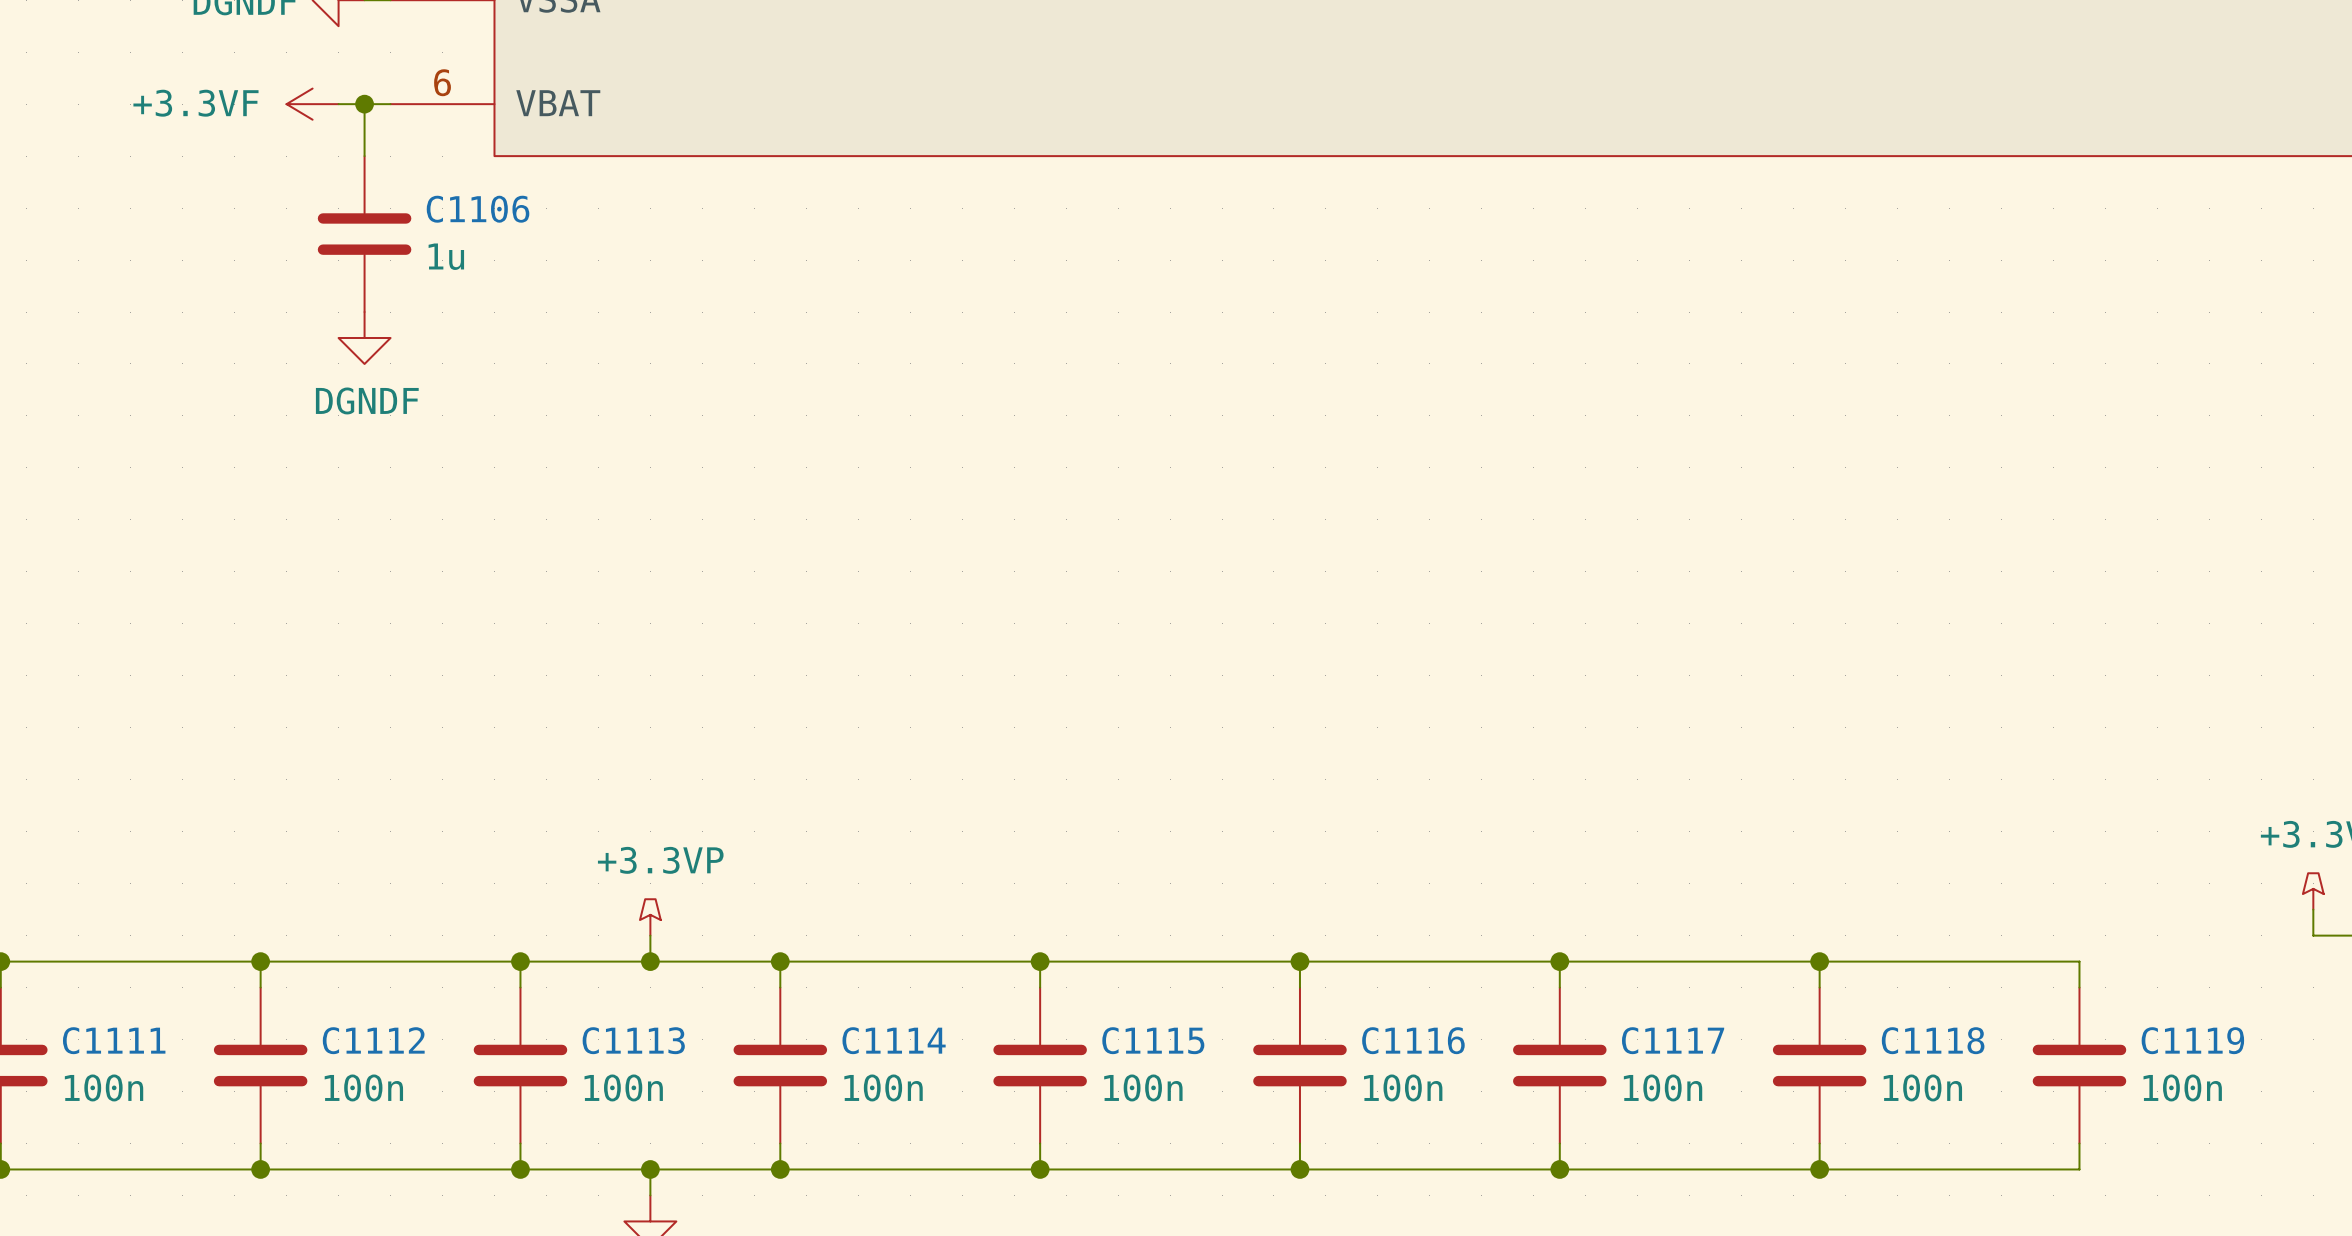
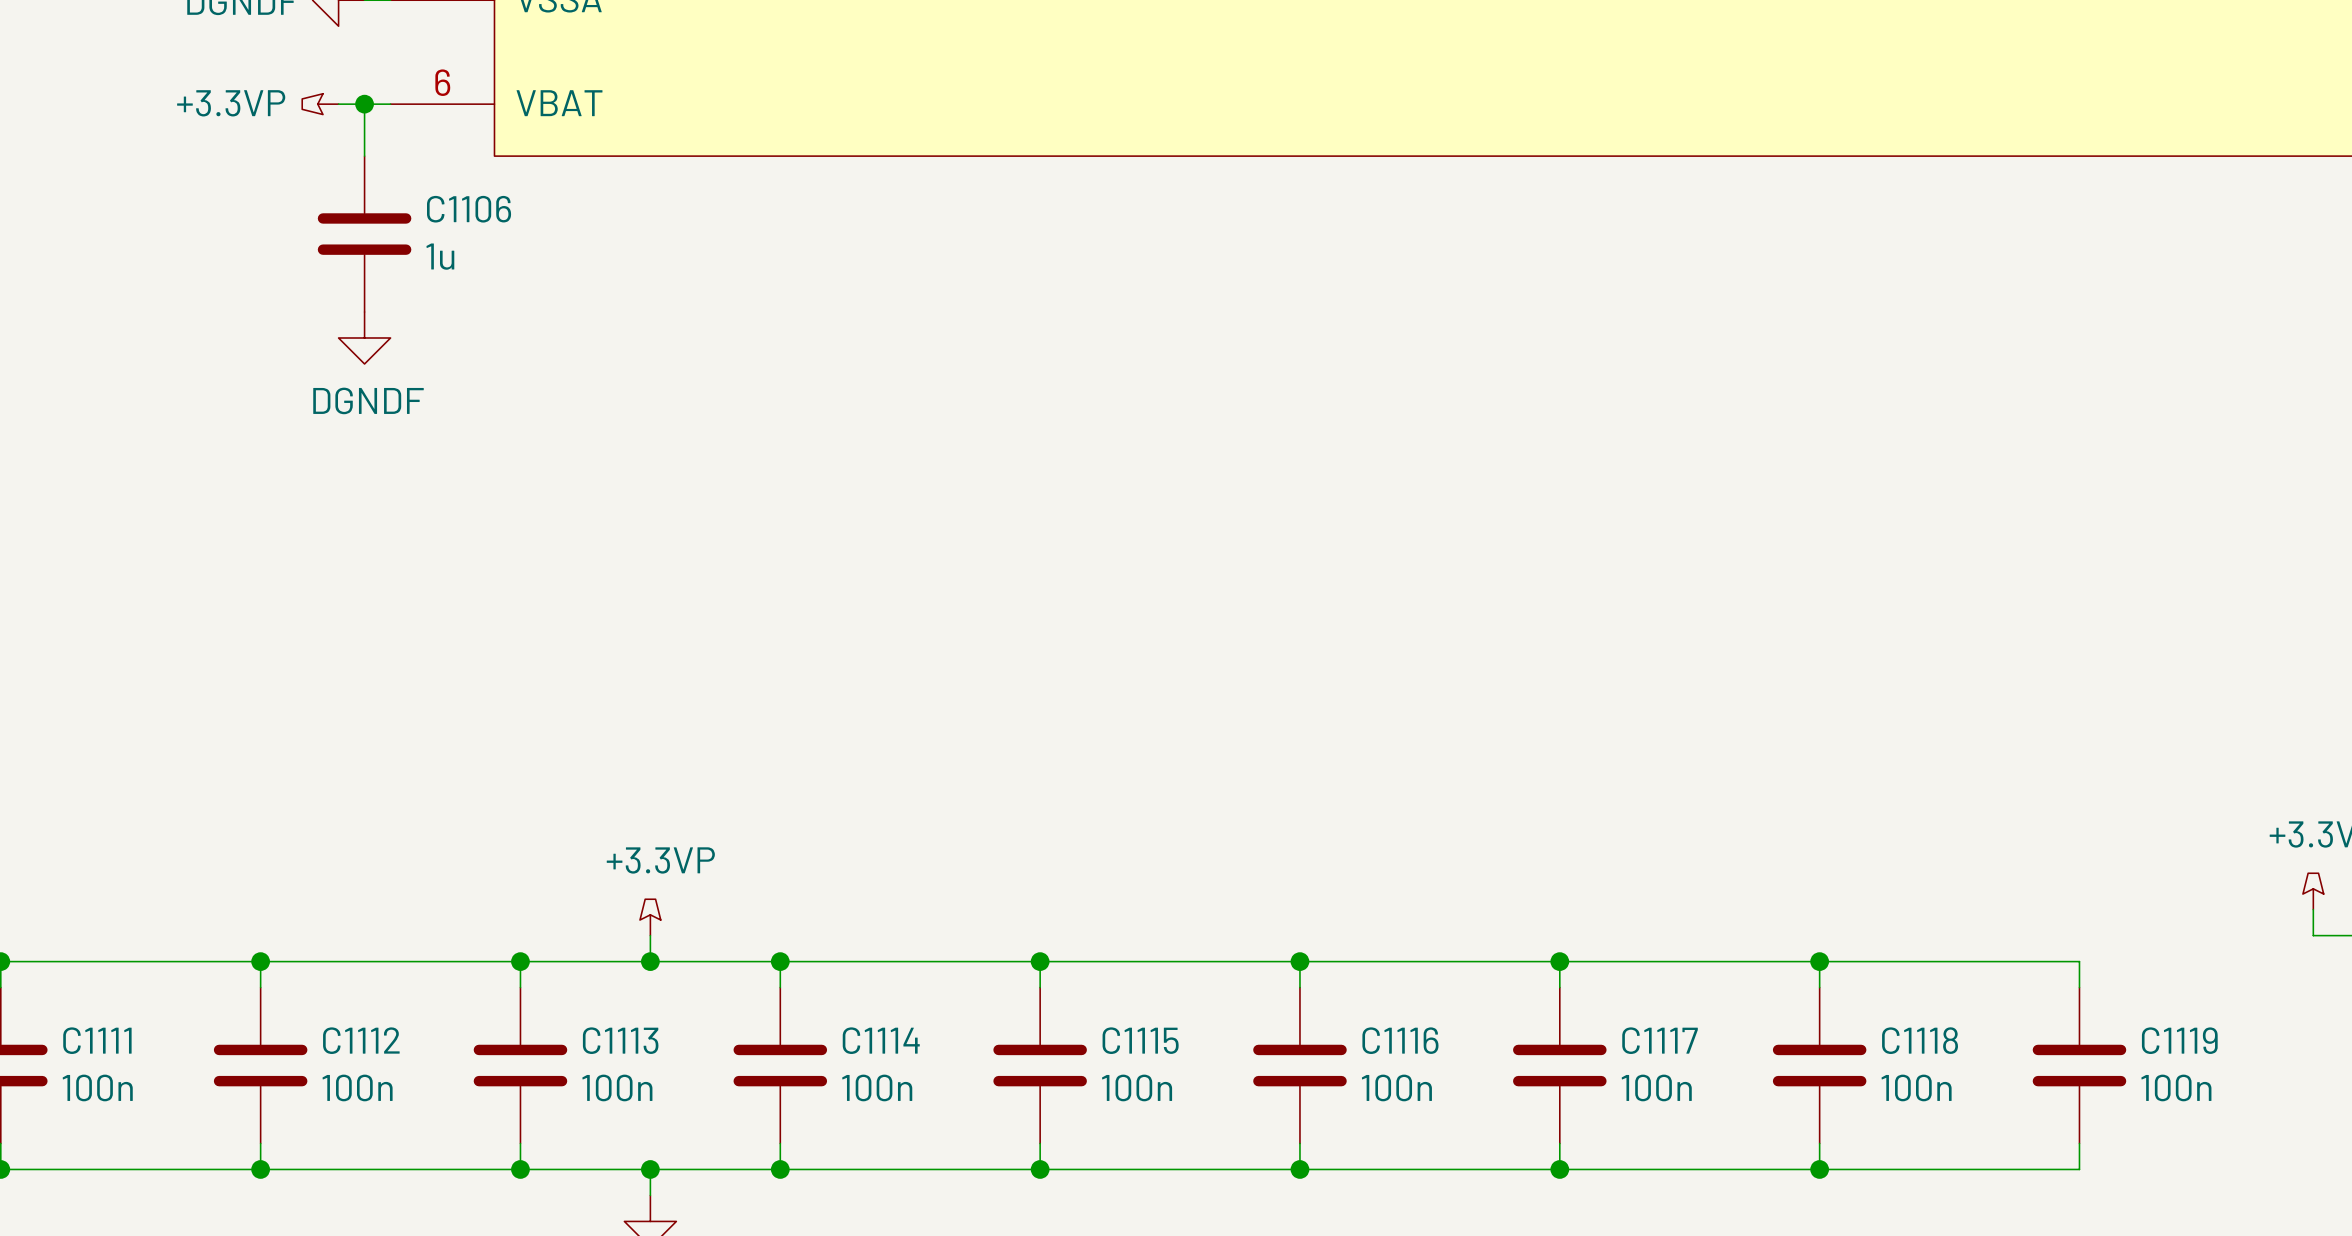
power symbol: +3.3VF (312, 104) -> +3.3VP (320, 104)

